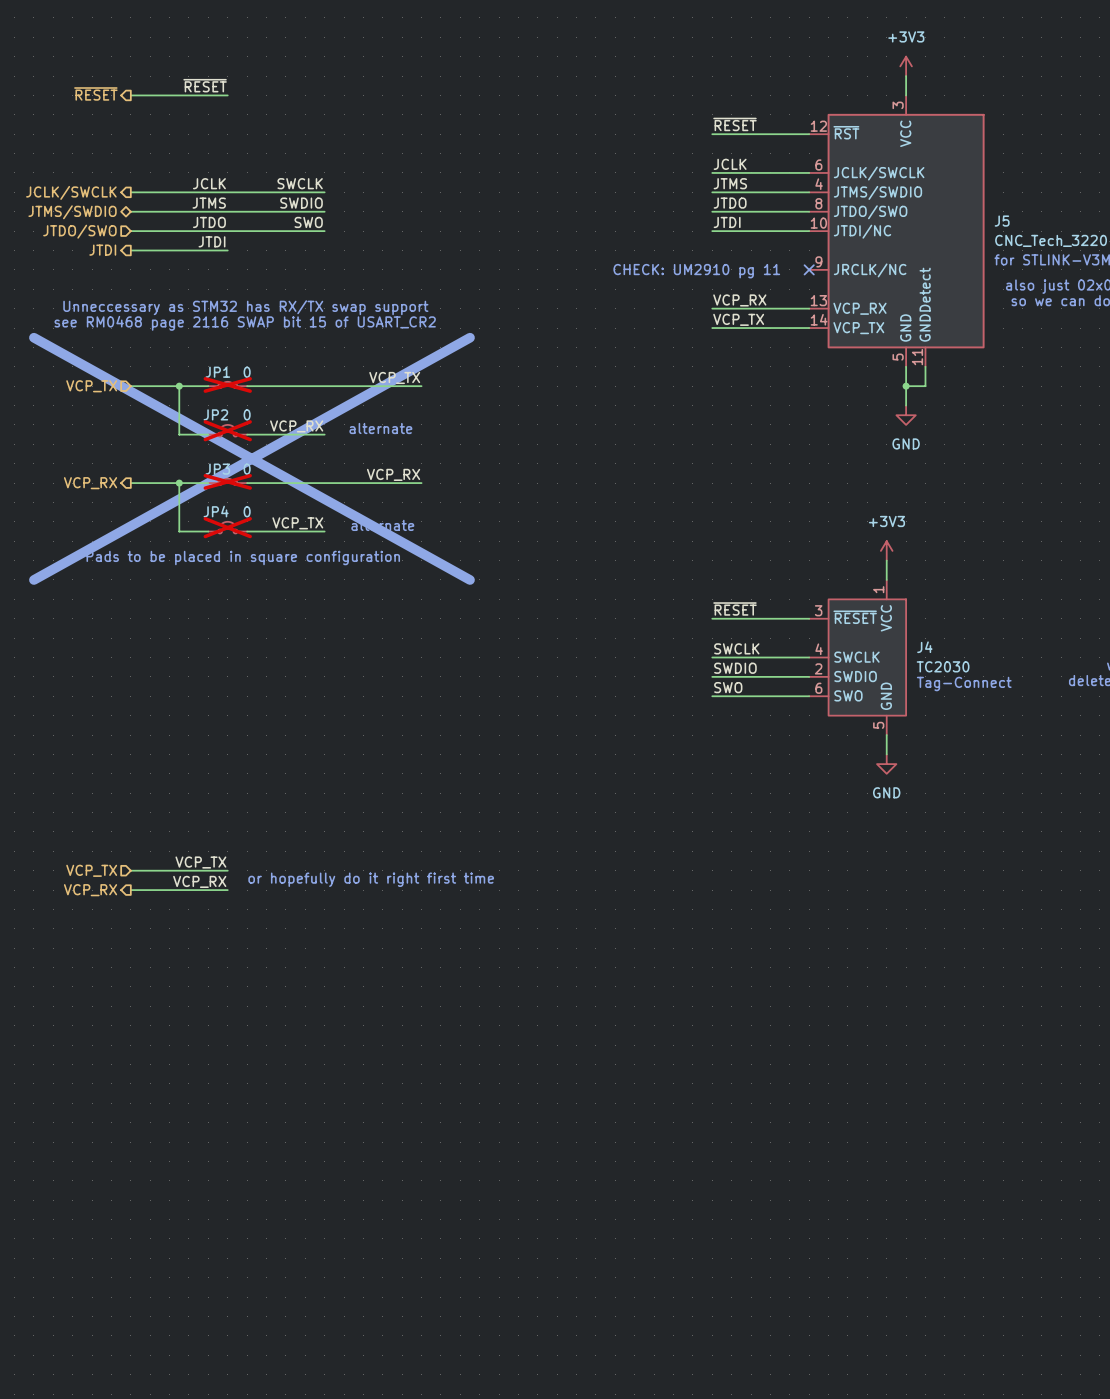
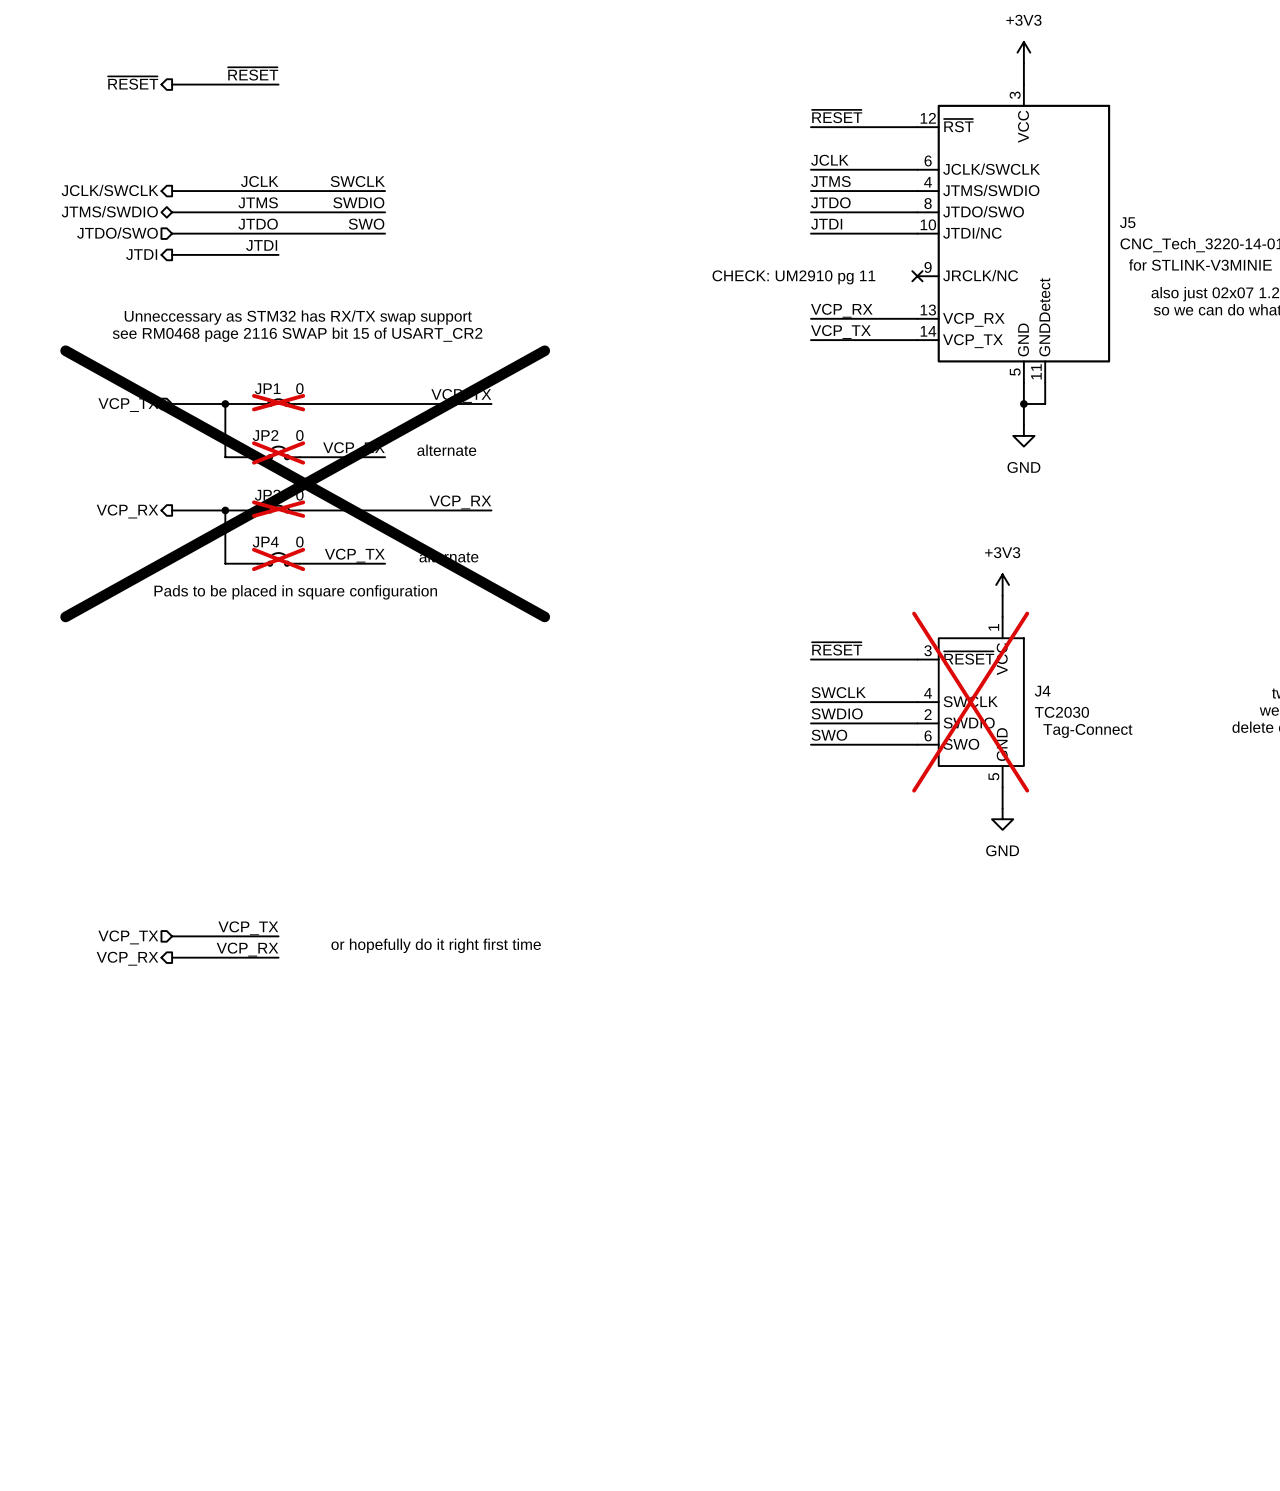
J4 do-not-place cross: none -> (970, 702)

